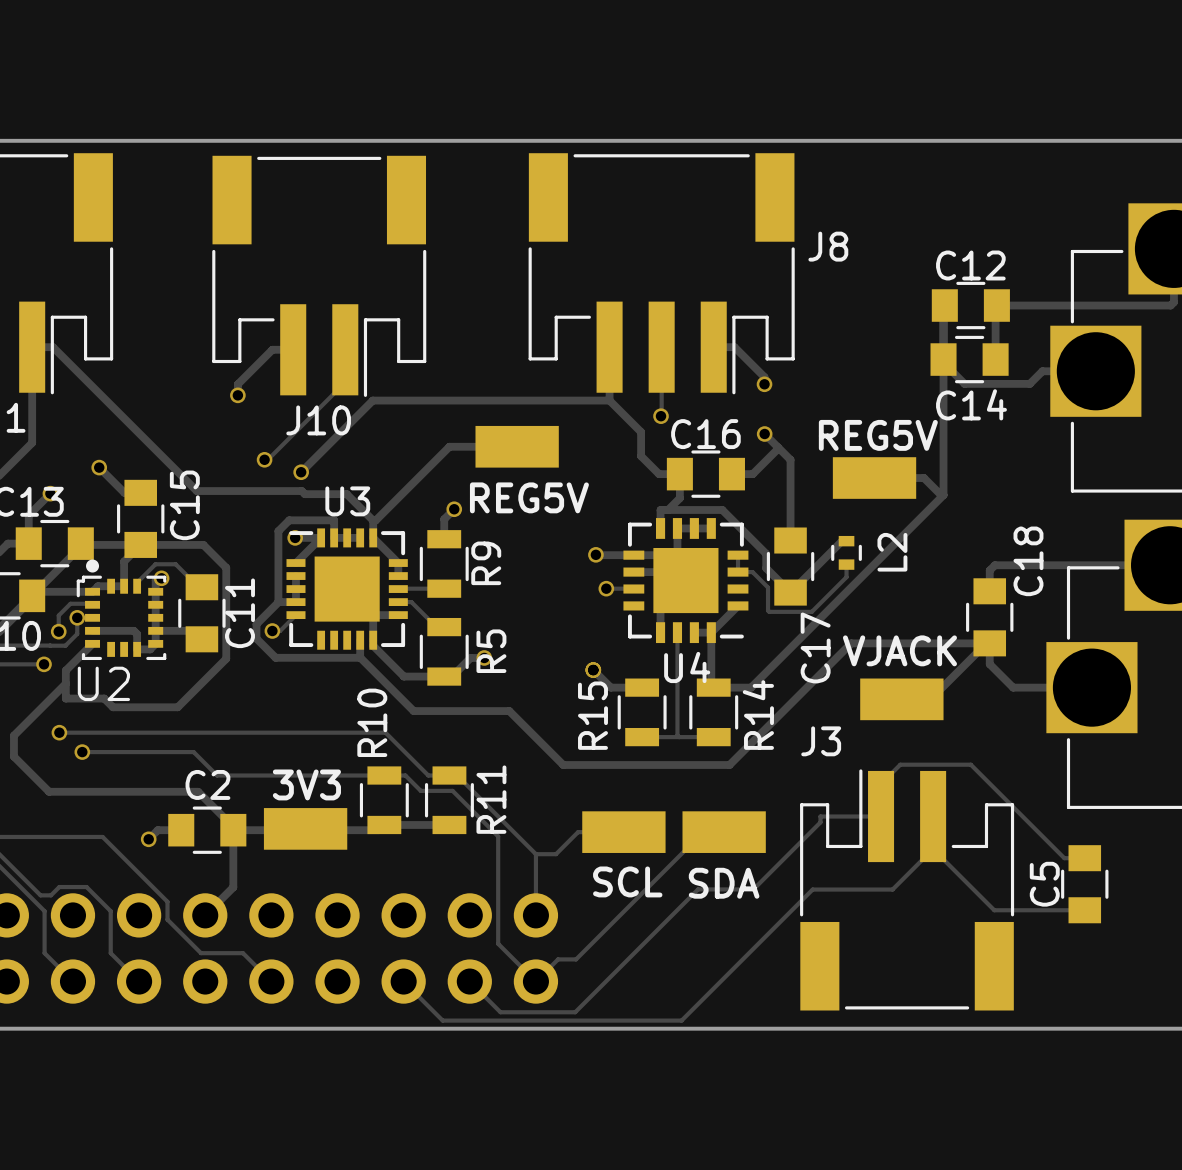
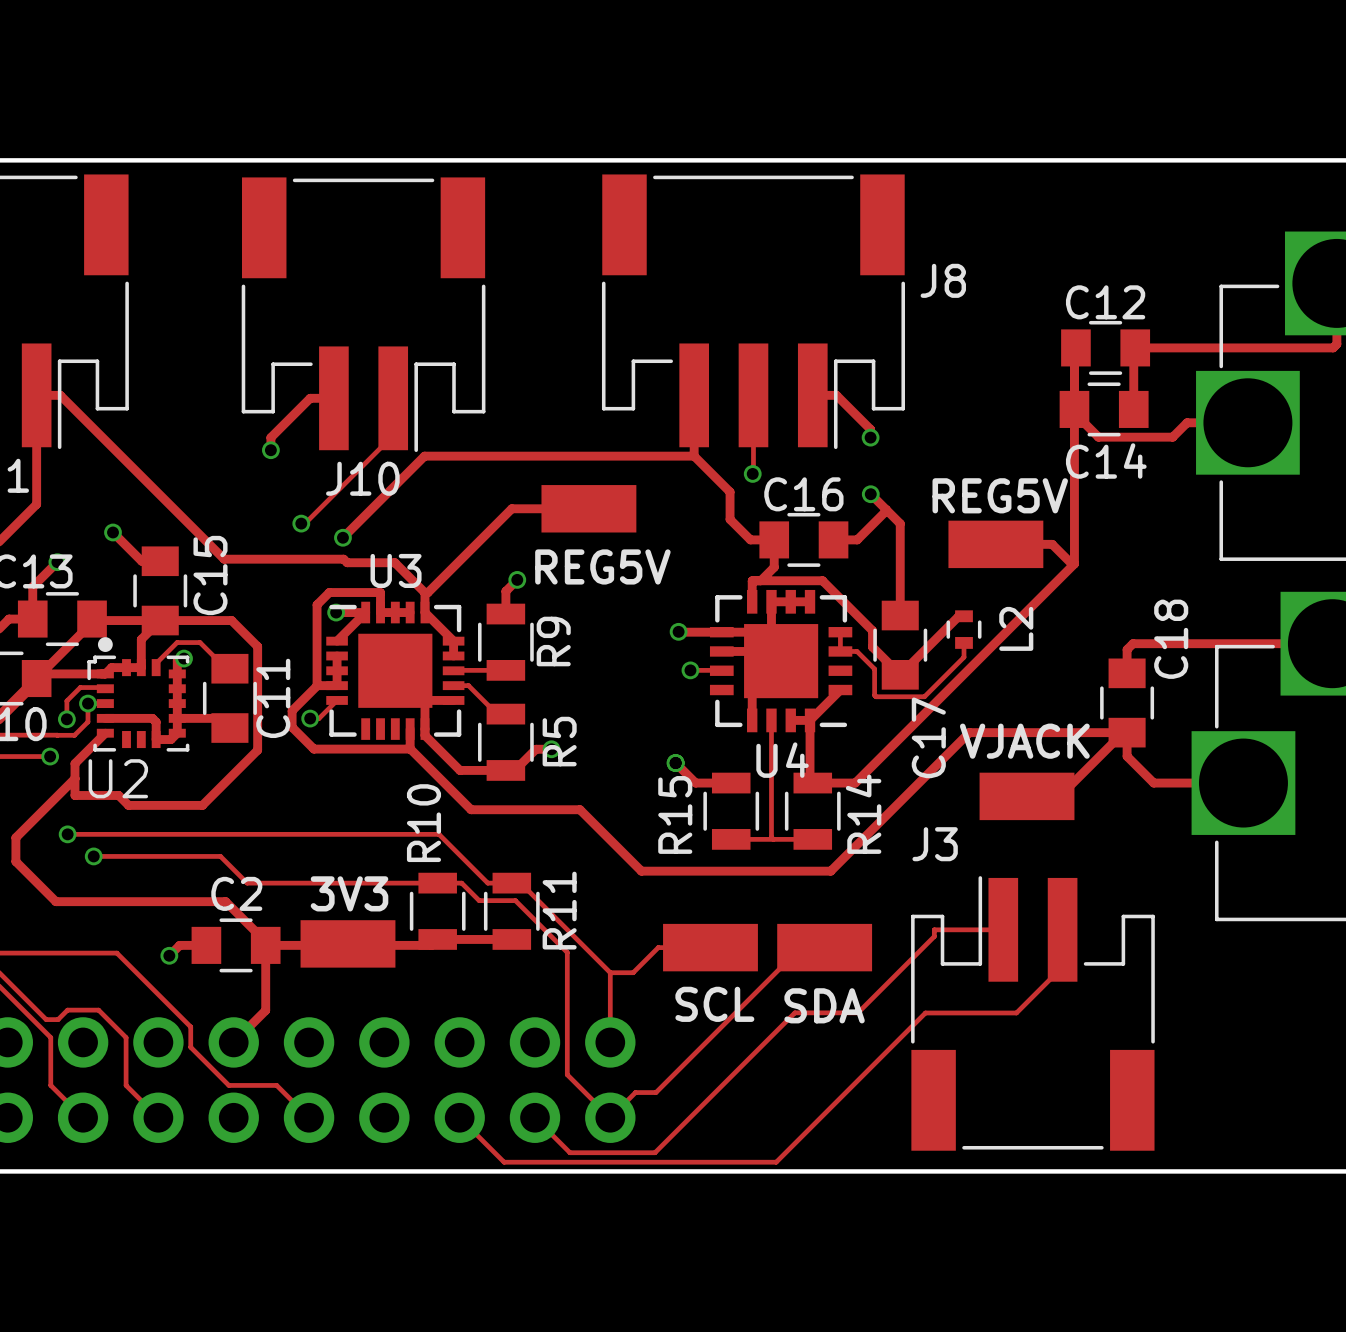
track: (881, 816) (881, 783) (900, 764) (970, 764) (1064, 858) (1084, 858) -> none
track: (933, 849) (994, 910) (1084, 910) -> none
C5: (1084, 884) -> none

